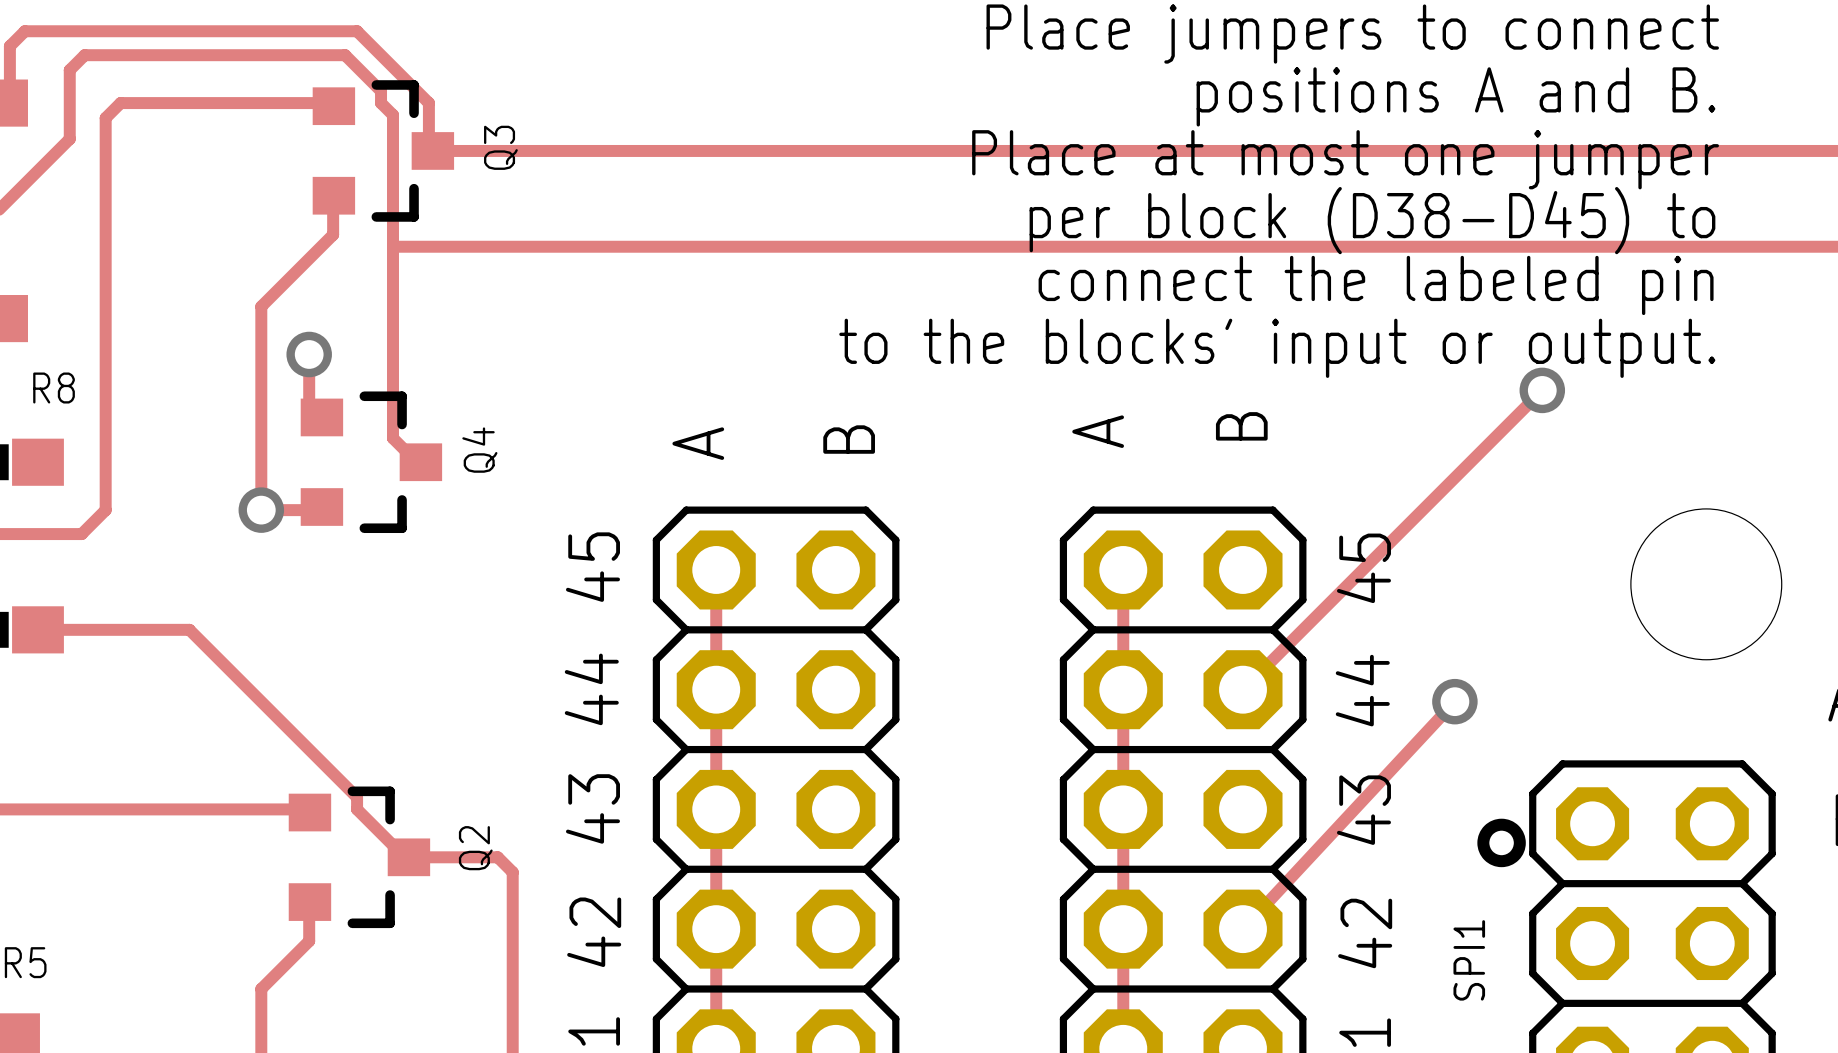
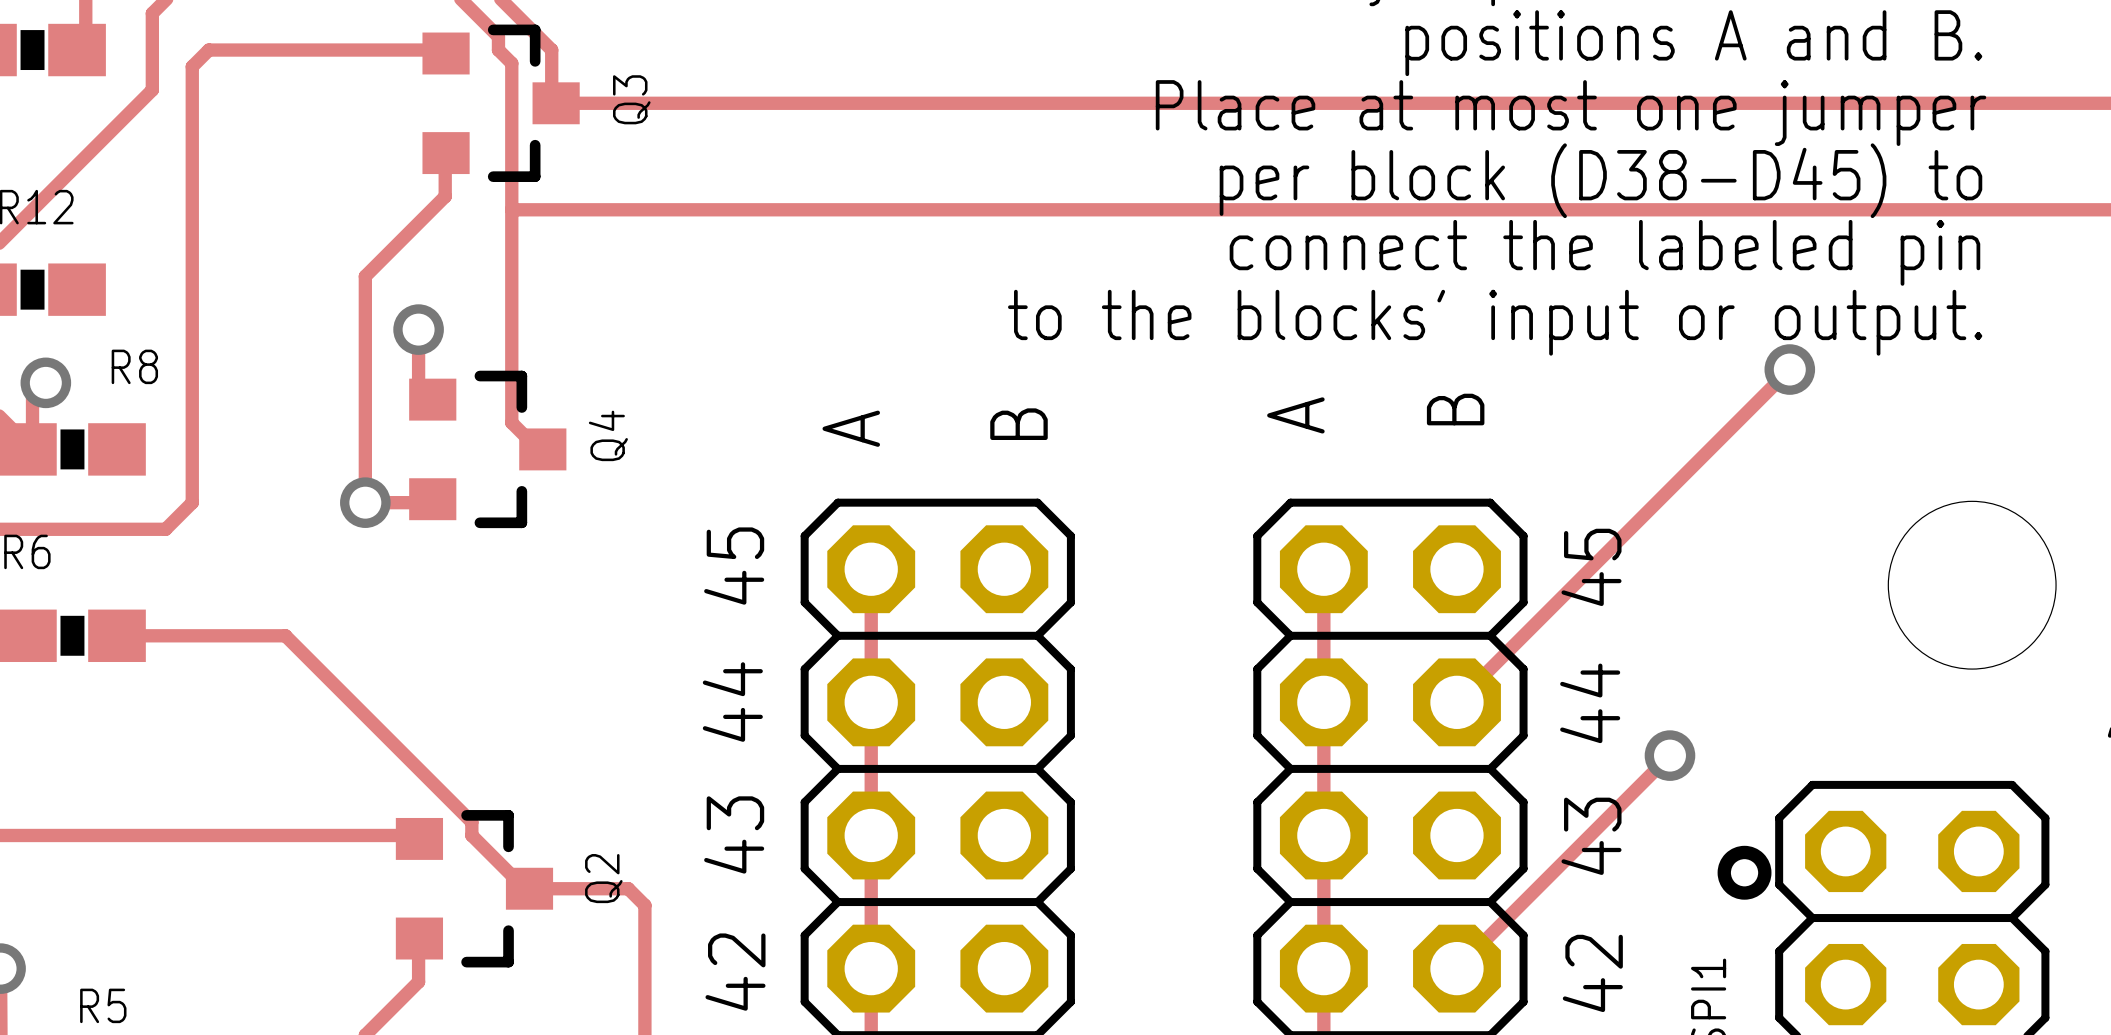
track: (1454, 701) (1243, 929) -> (1669, 755) (1456, 968)
via position: (1454, 701) -> (1669, 755)

